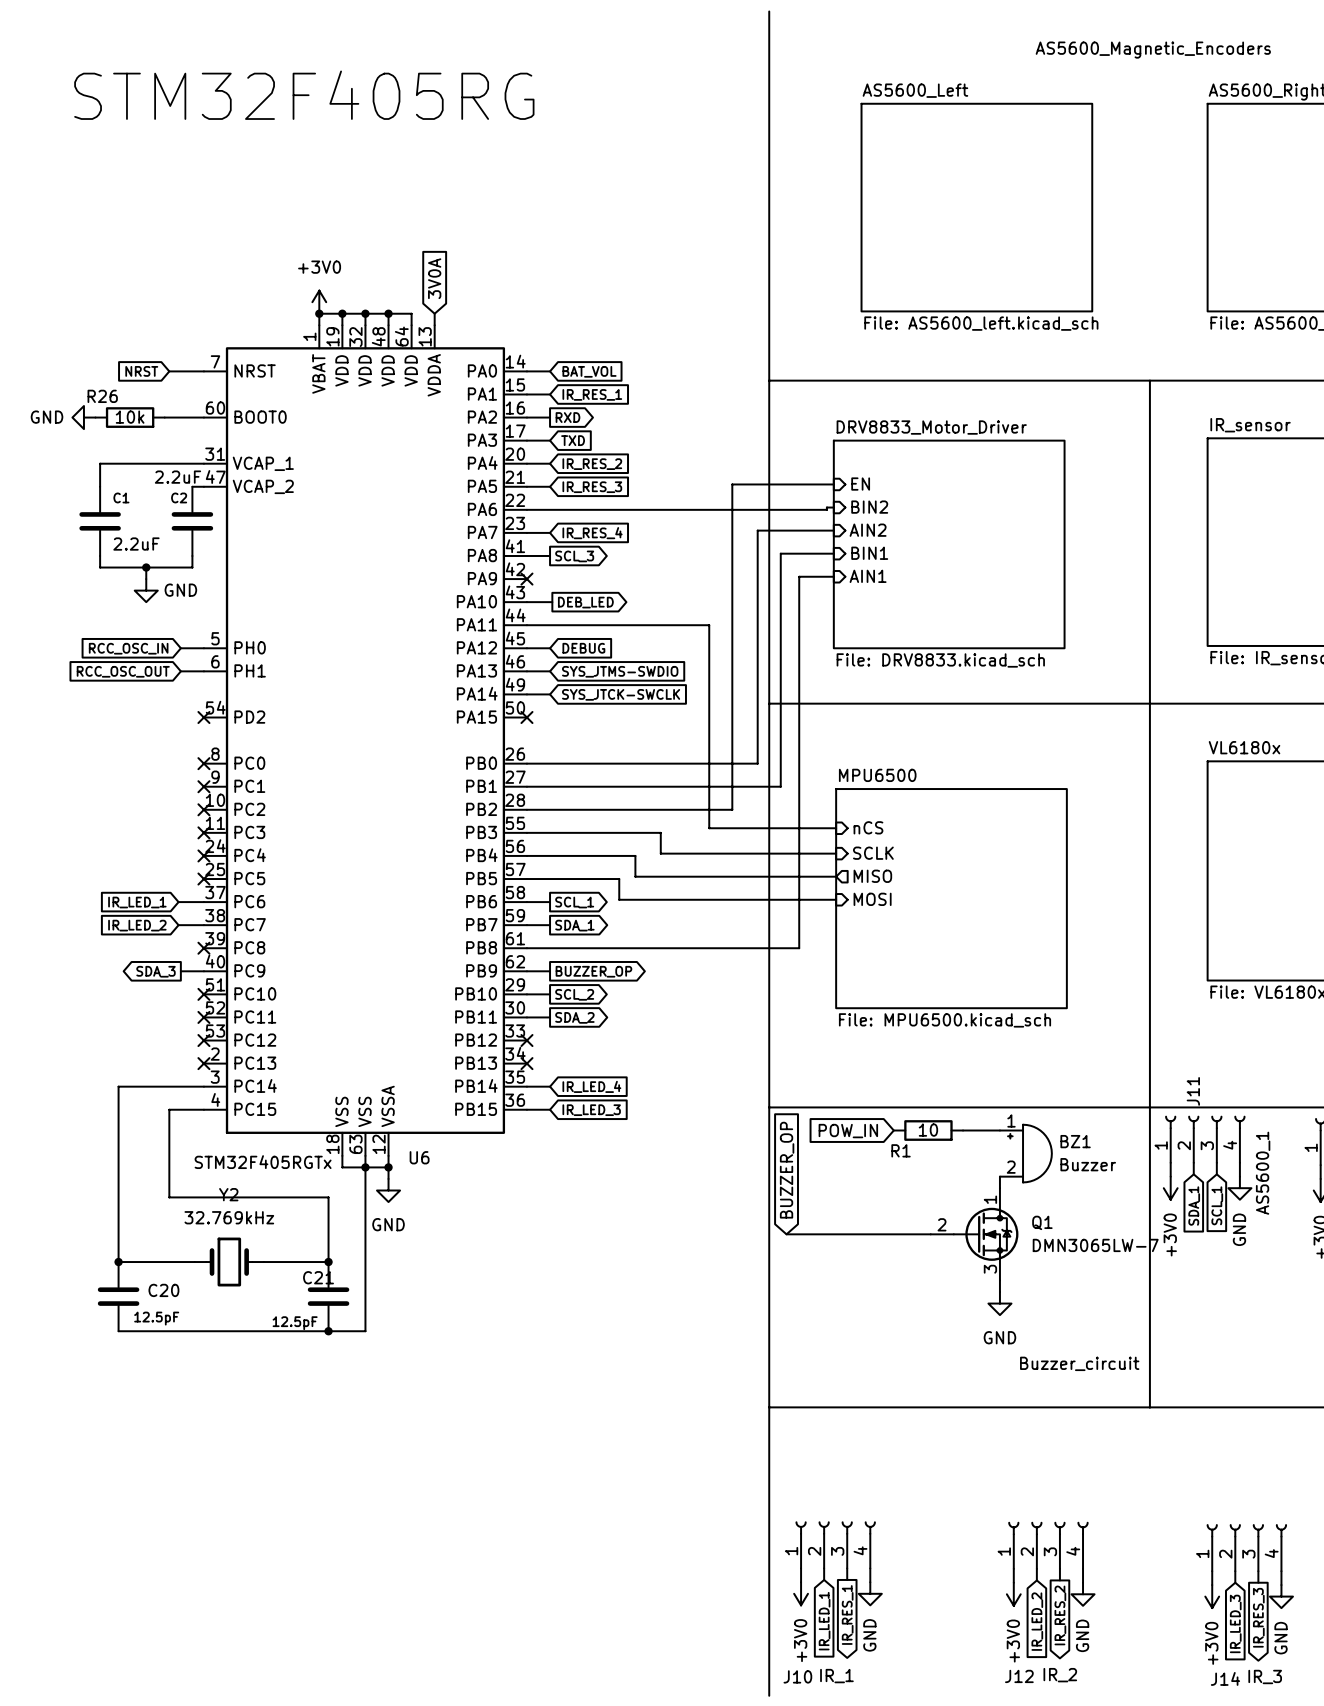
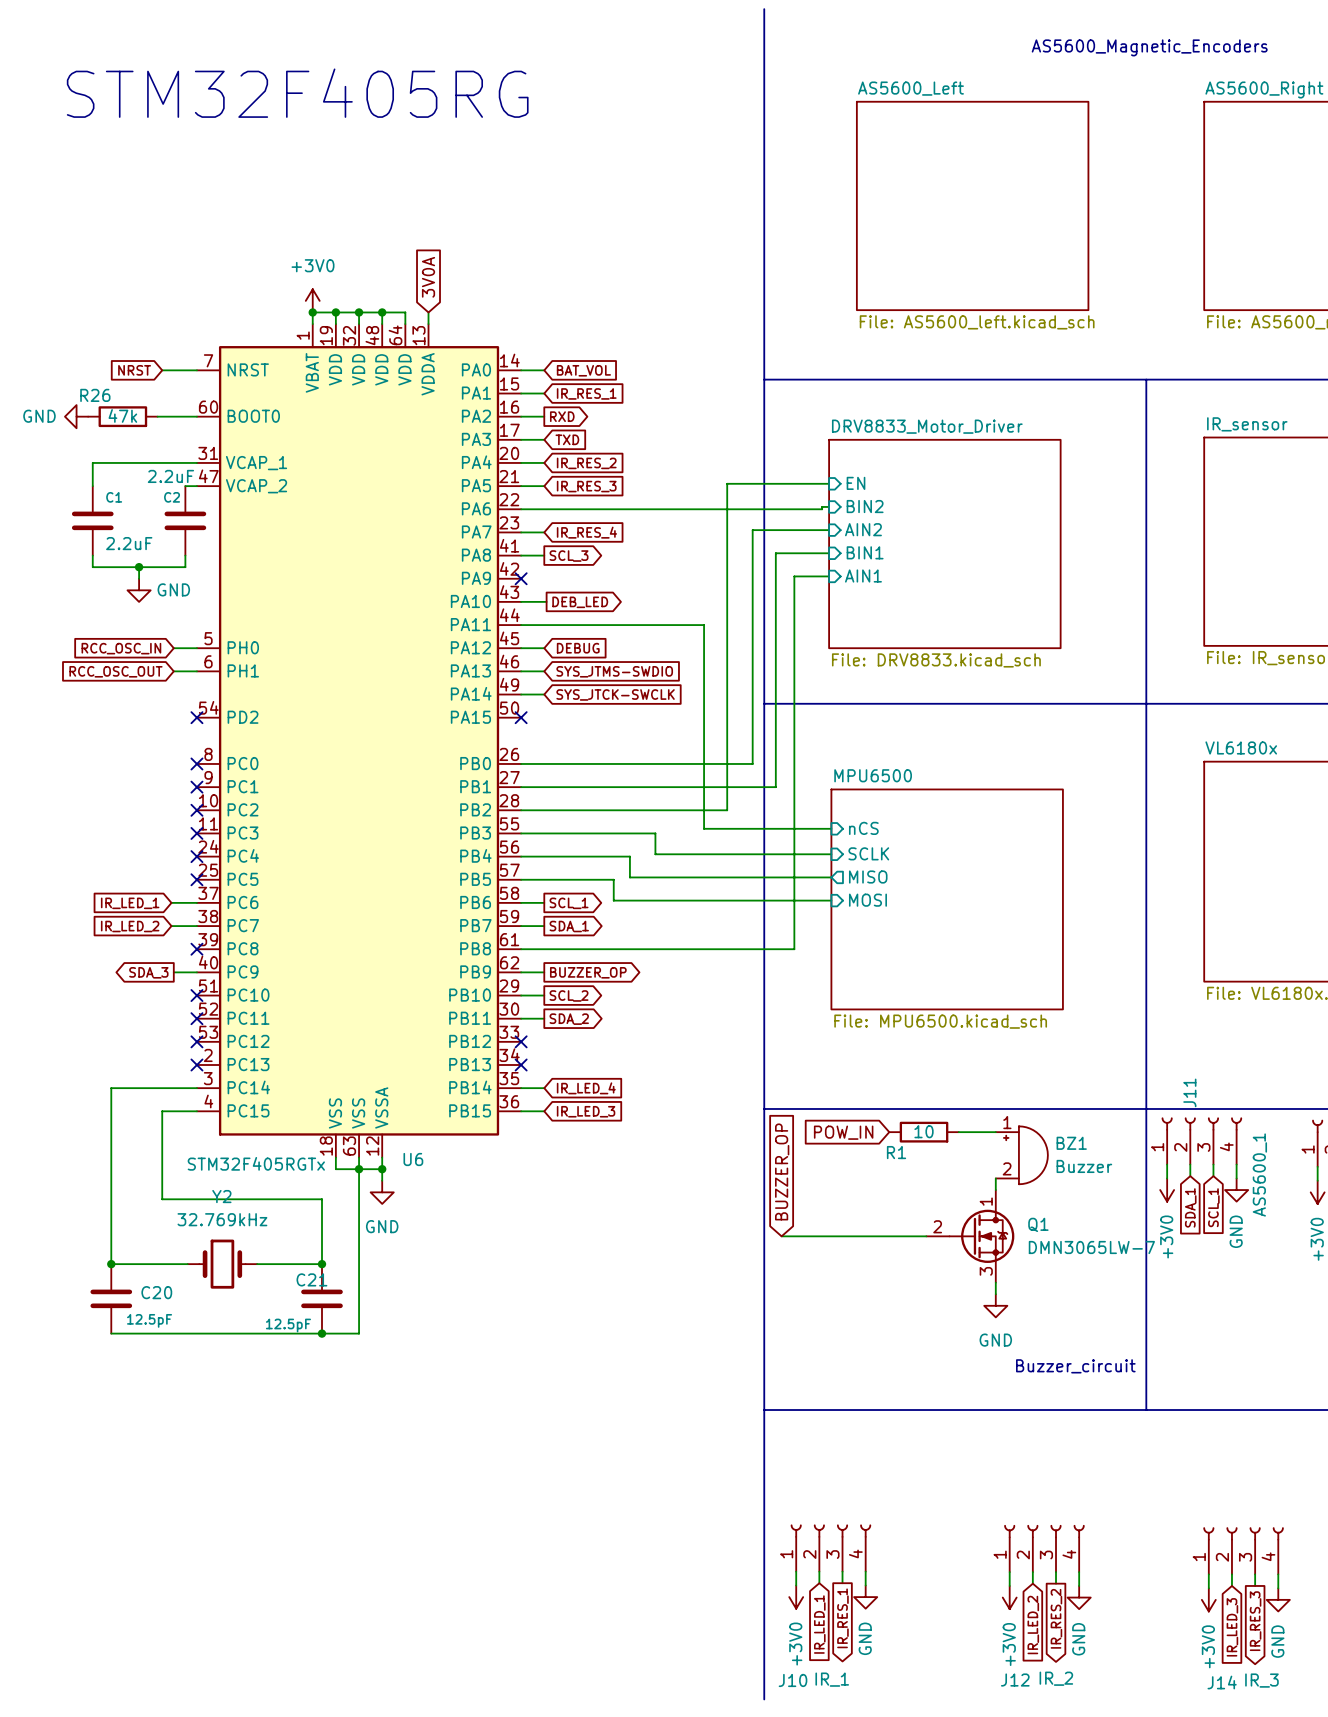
R26 value: 10k (130, 417) -> 47k (122, 415)

